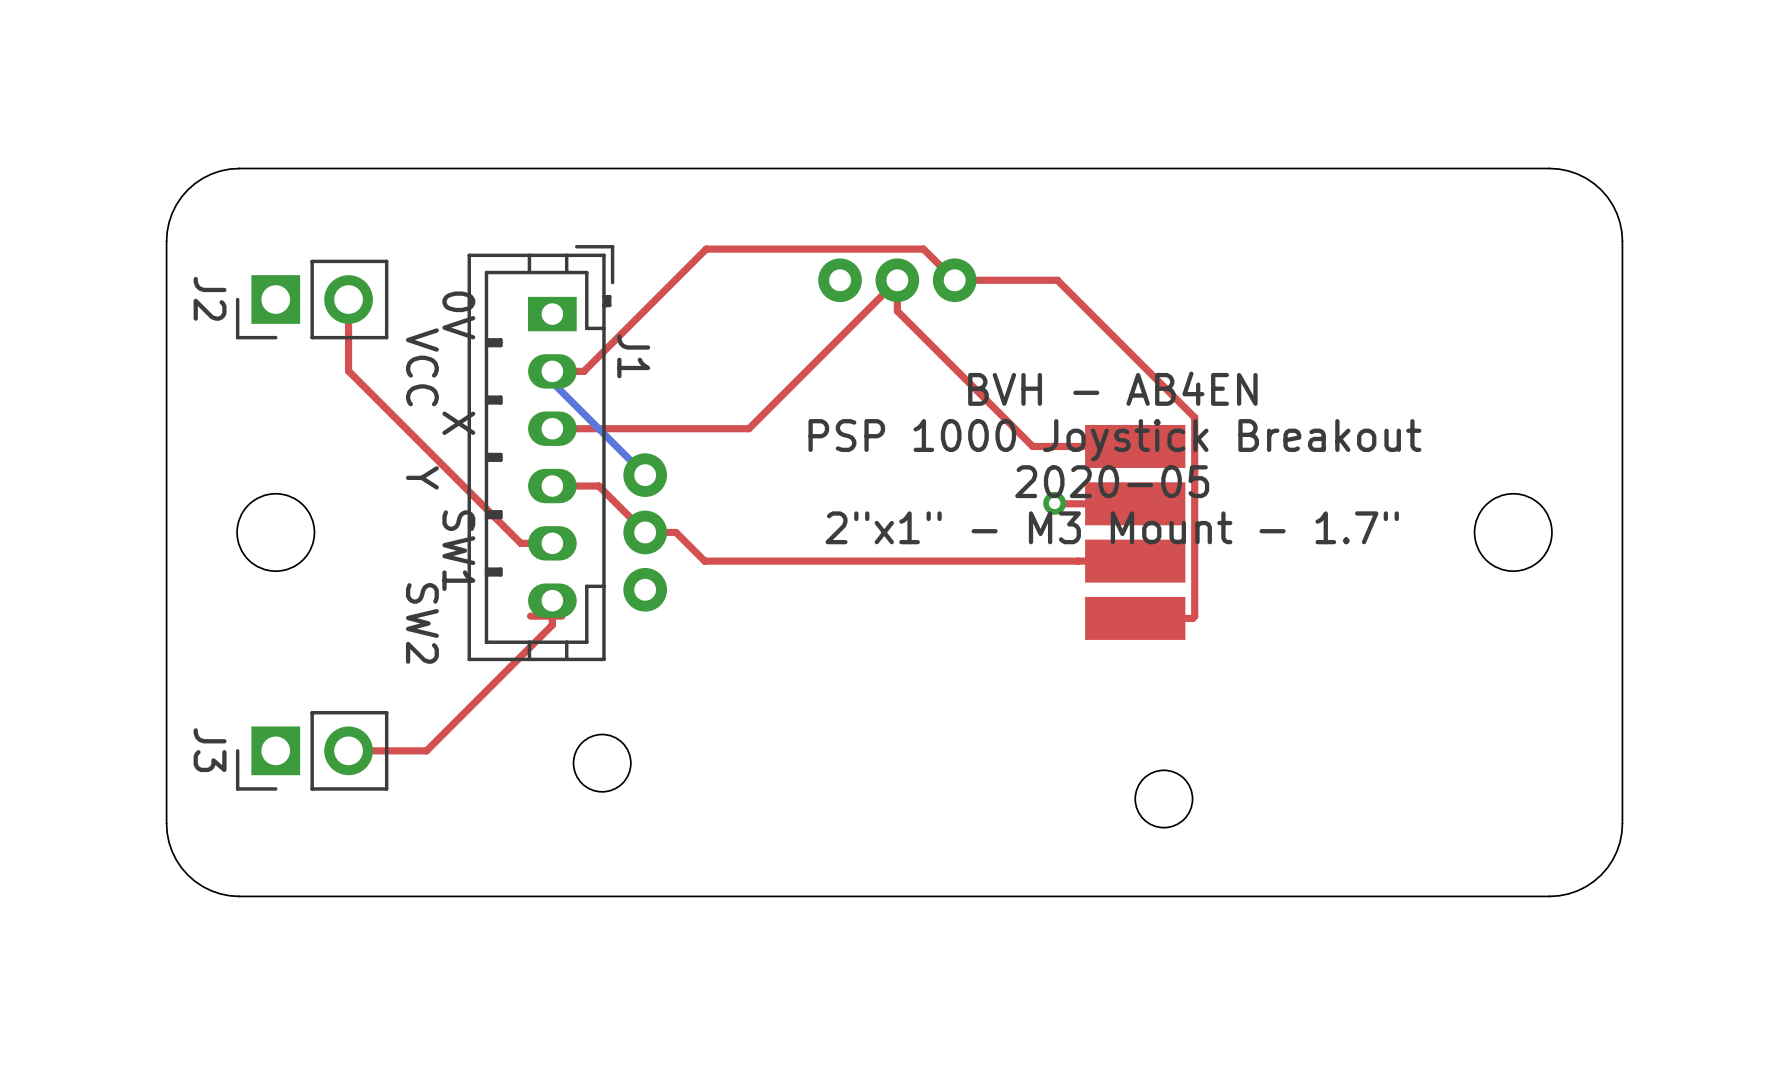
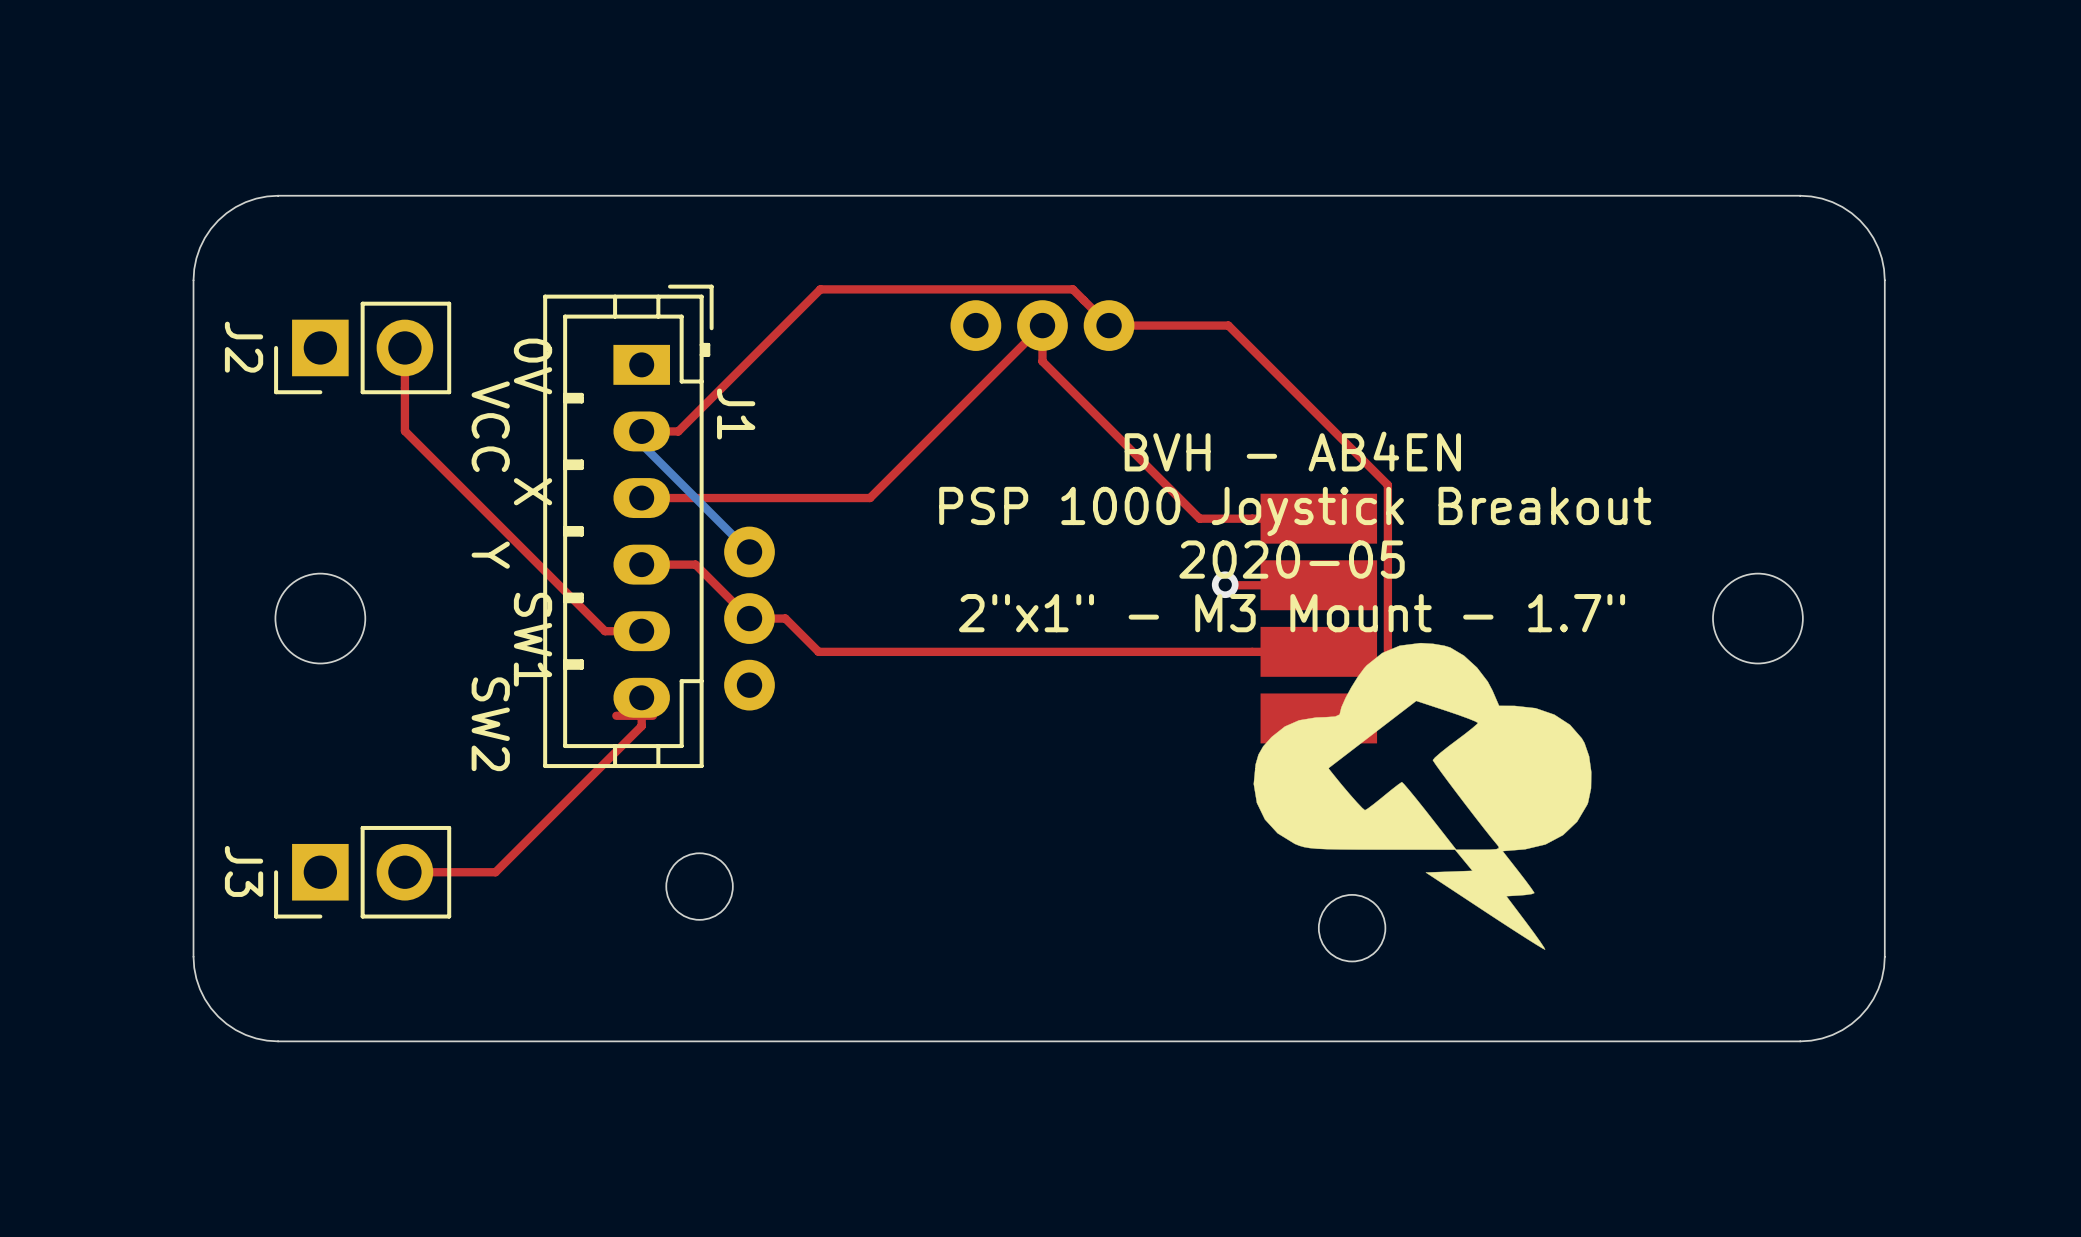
drawing: none -> [1253, 642, 1592, 950]

